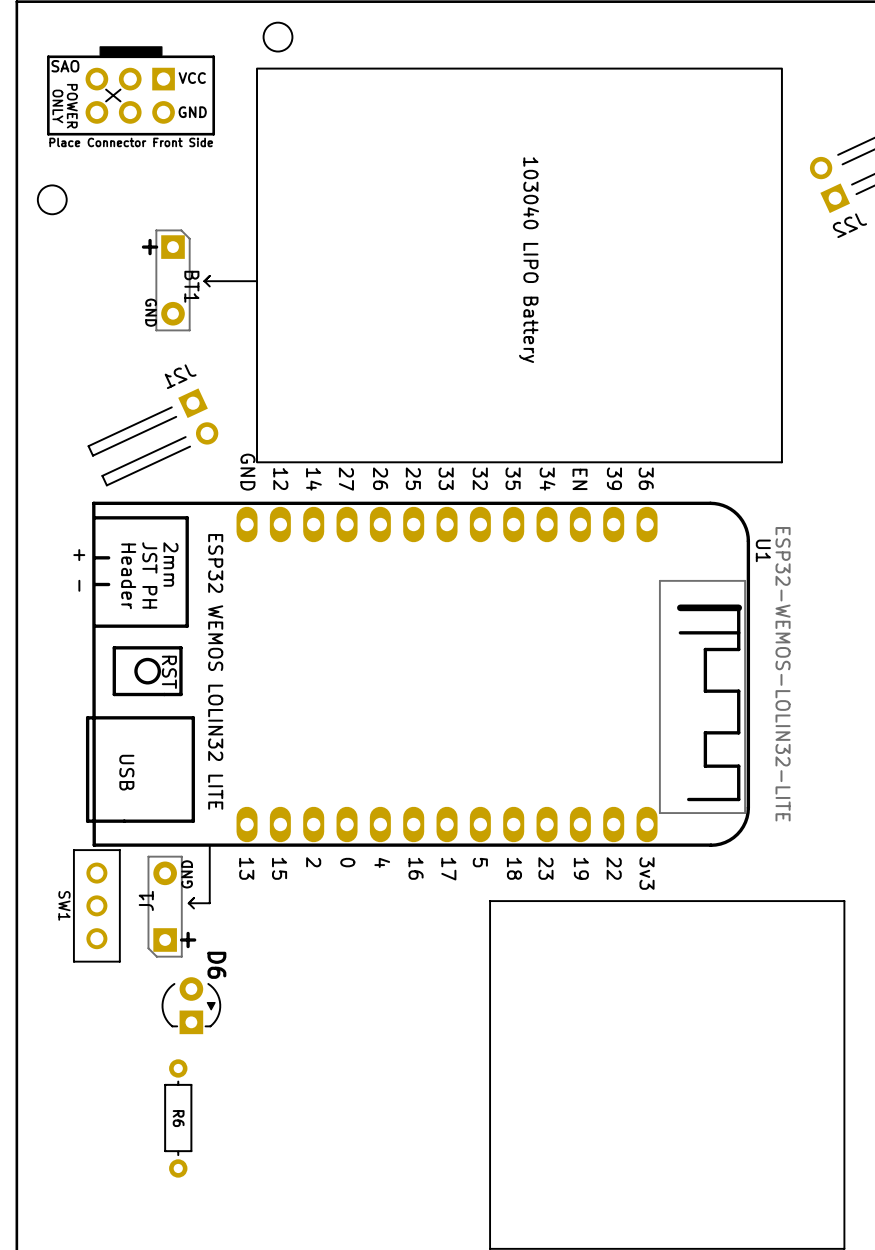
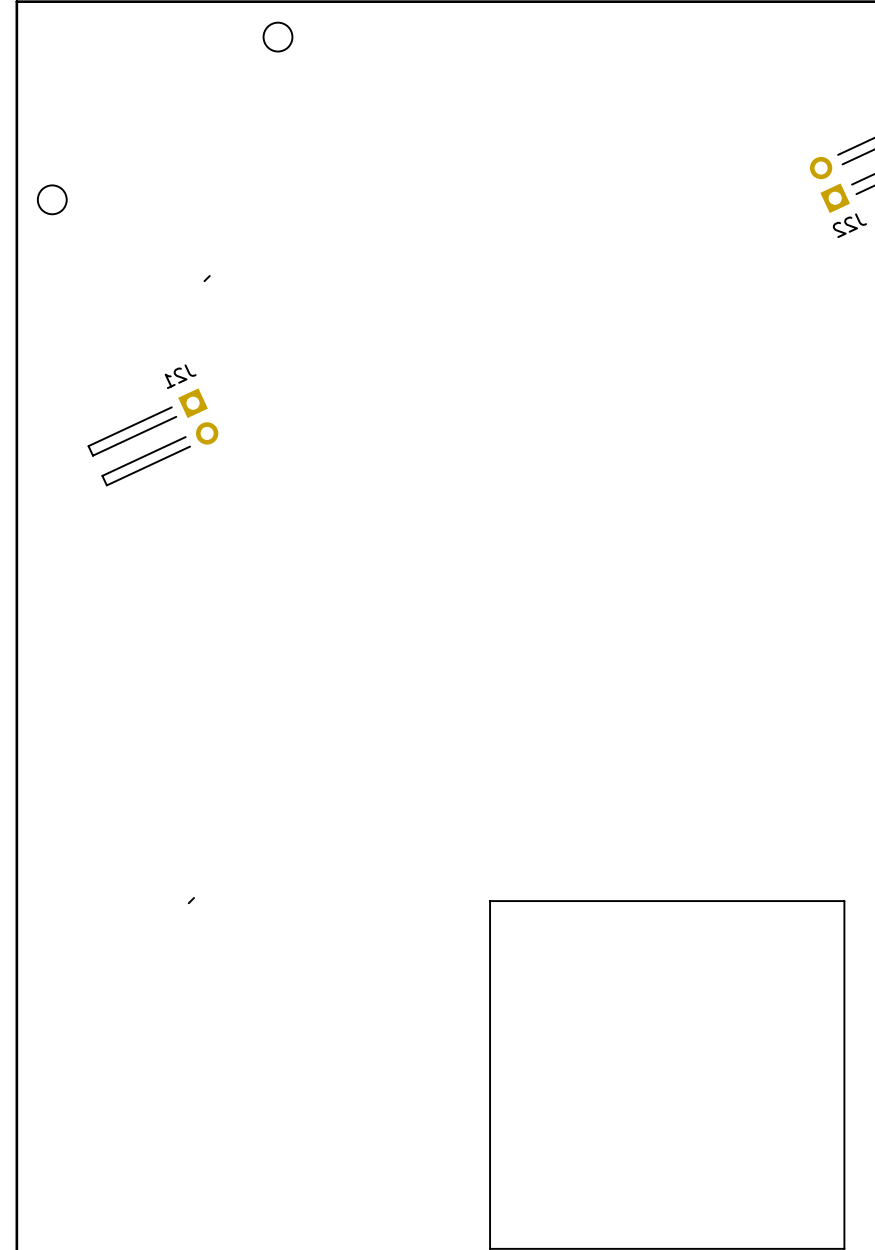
drawing: [256, 67, 783, 464] -> none
part: (131, 90) -> none
BT1: (166, 280) -> none
line: (257, 281) (204, 281) (209, 286) -> none
U1: ESP32-WEMOS-LOLIN32-LITE (418, 674) -> none
line: (209, 845) (209, 903) (188, 903) (194, 908) -> none
SW1: (96, 905) -> none
J1: (172, 906) -> none
D6: (191, 1005) -> none
R6: (178, 1118) -> none

